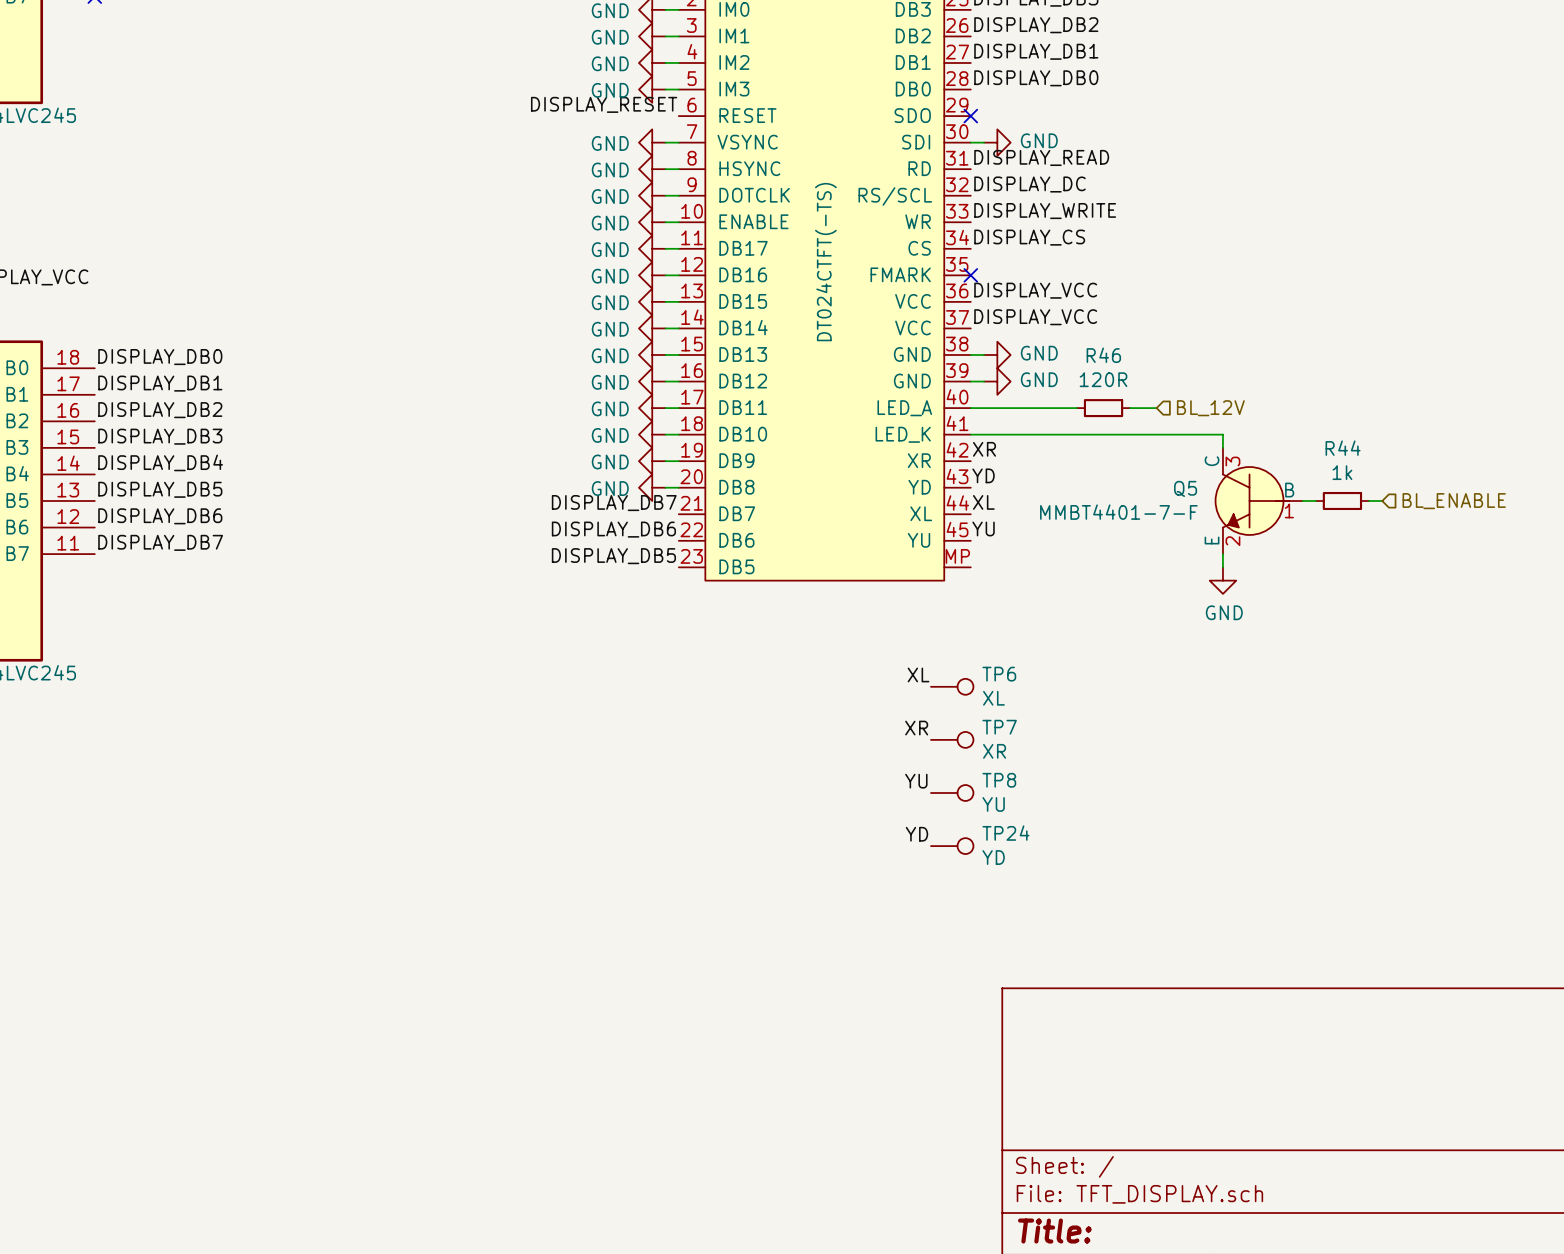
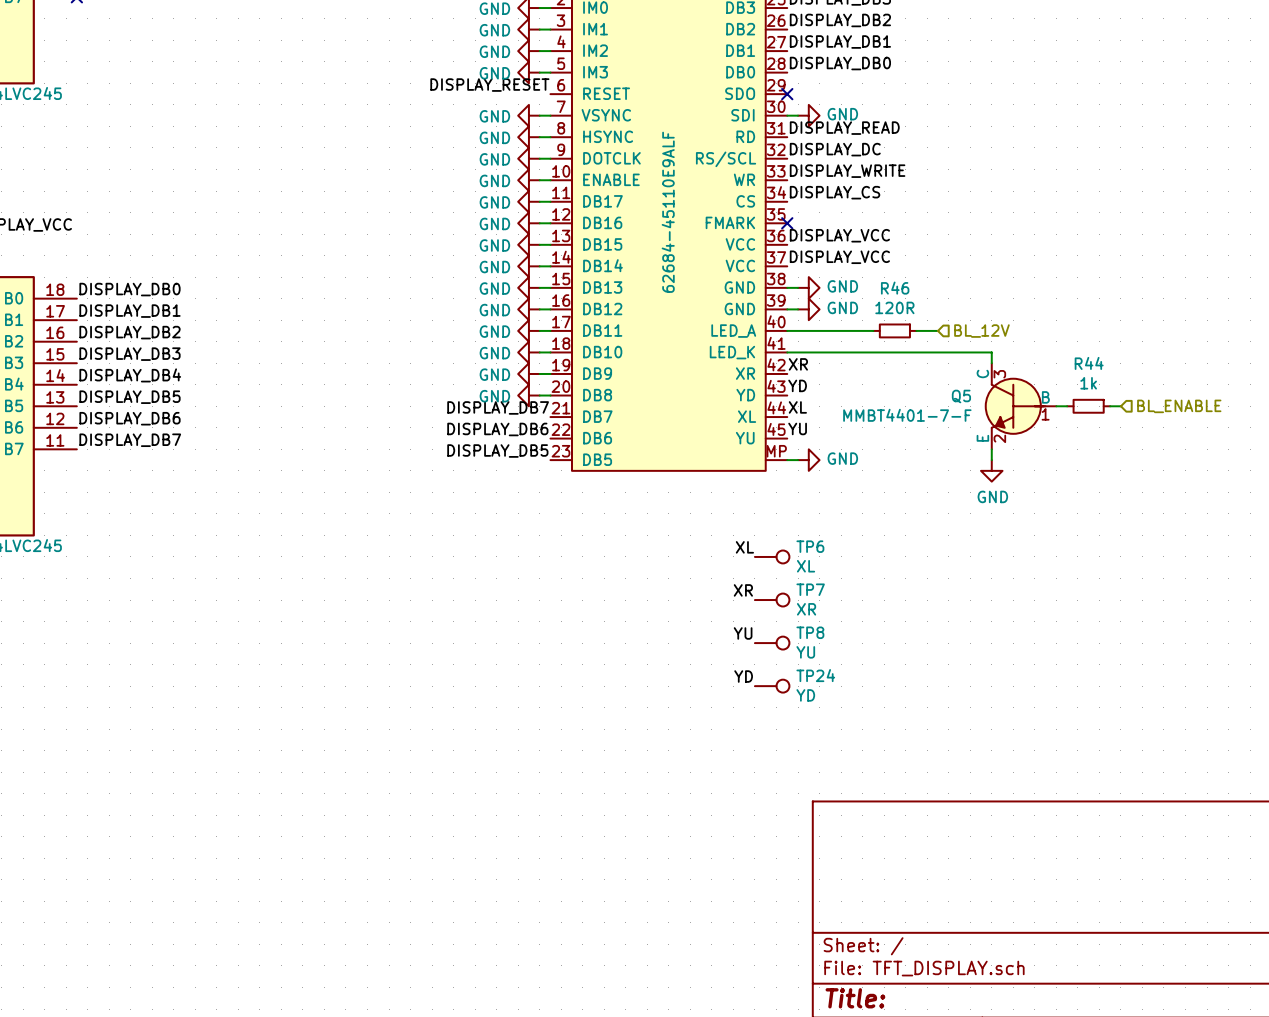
part value: DT024CTFT(-TS) (825, 262) -> 62684-45110E9ALF (668, 212)
wire: none -> (787, 460) (798, 460)
power symbol: none -> GND (808, 460)

